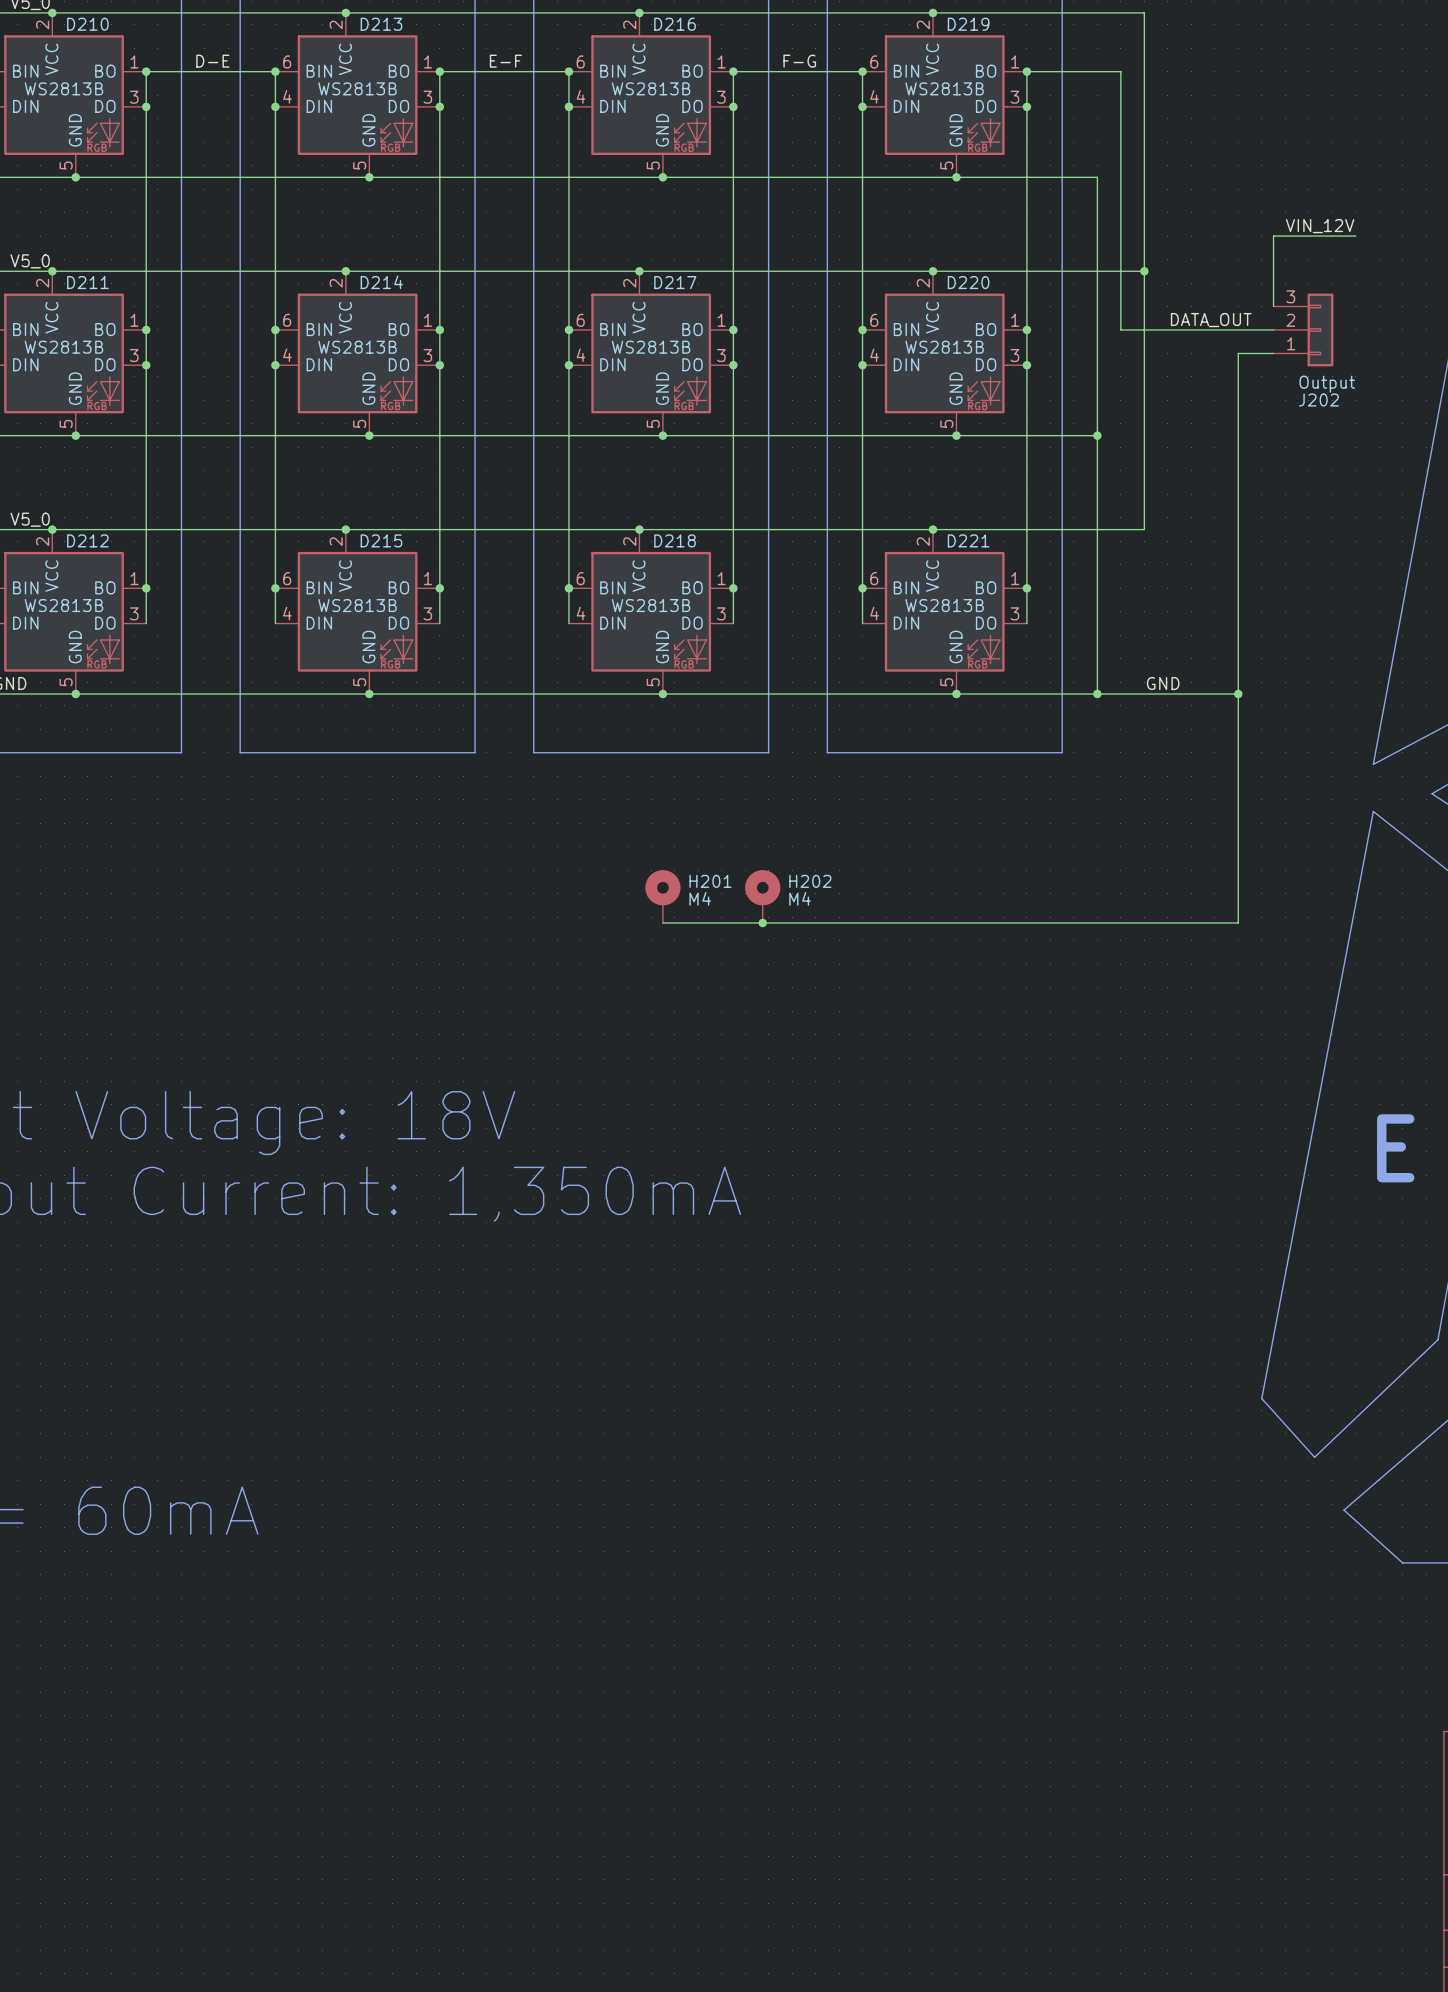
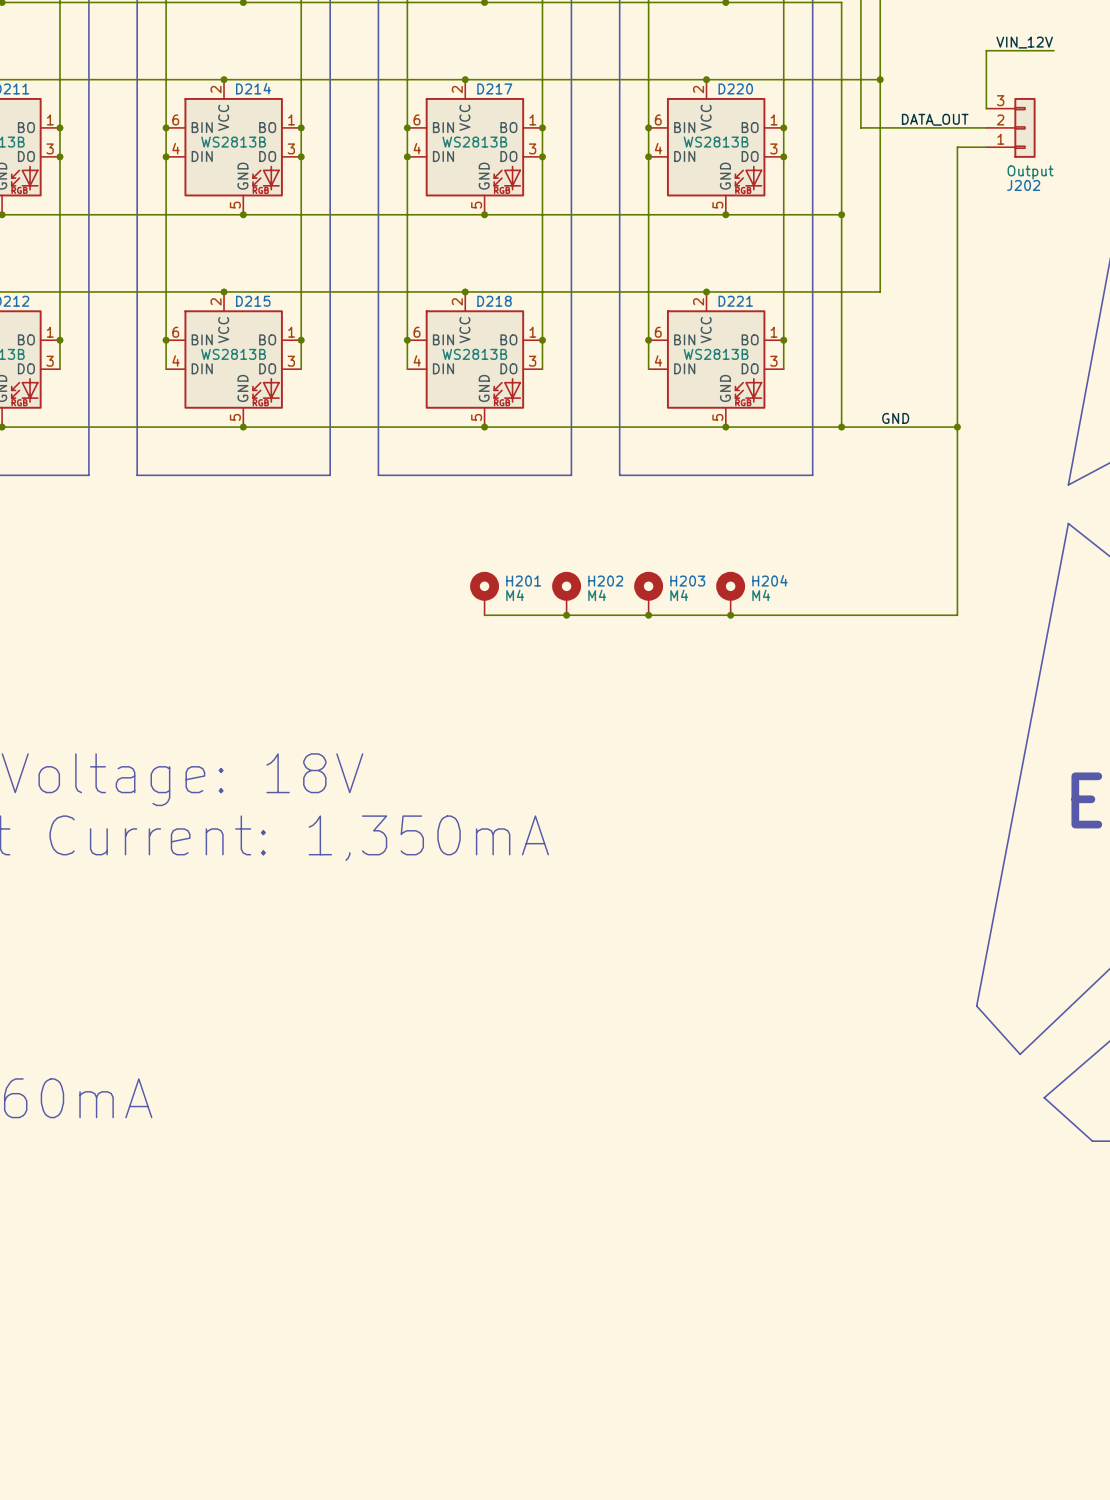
H203: none -> M4 (648, 593)
H204: none -> M4 (730, 593)
junction: none -> (648, 615)
junction: none -> (730, 615)

